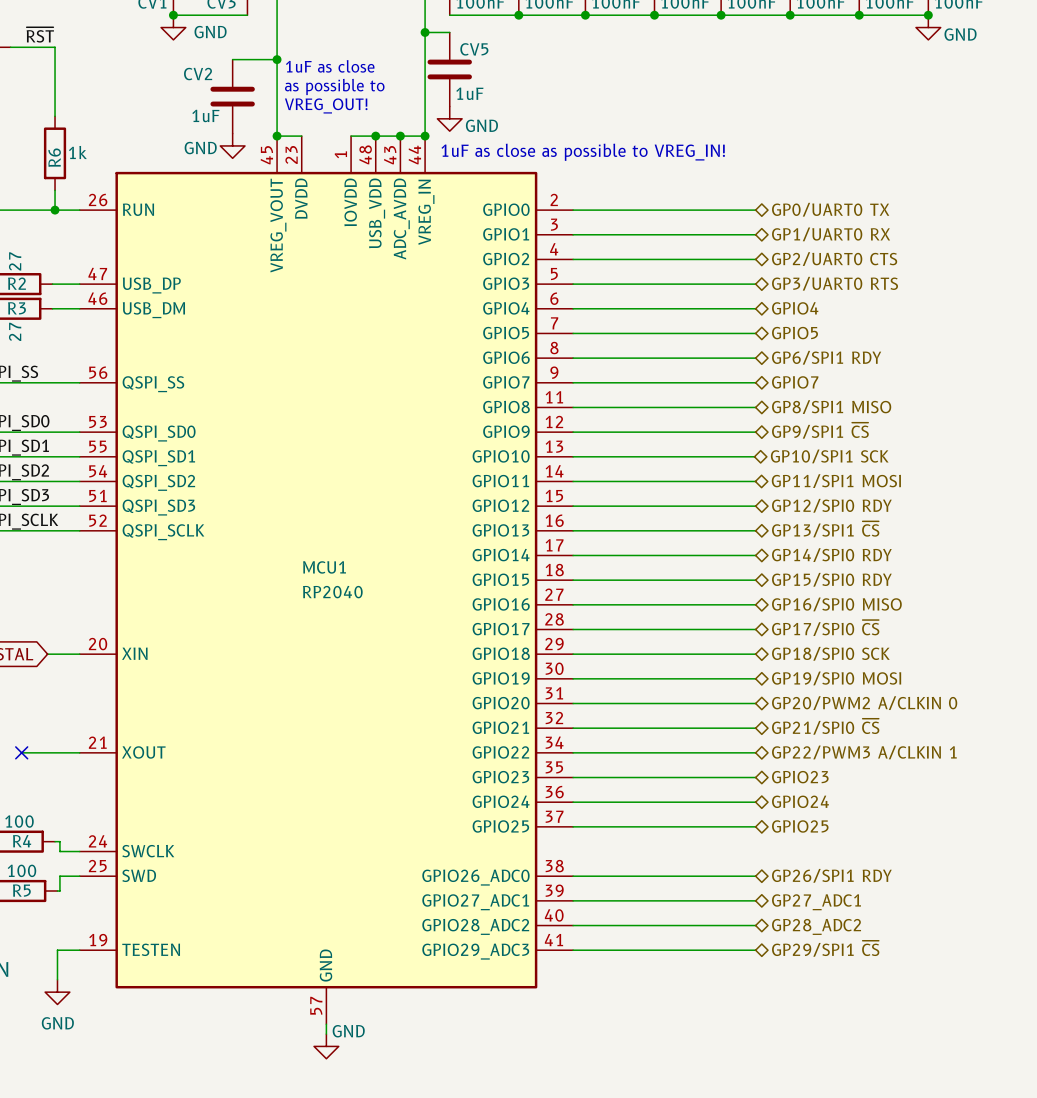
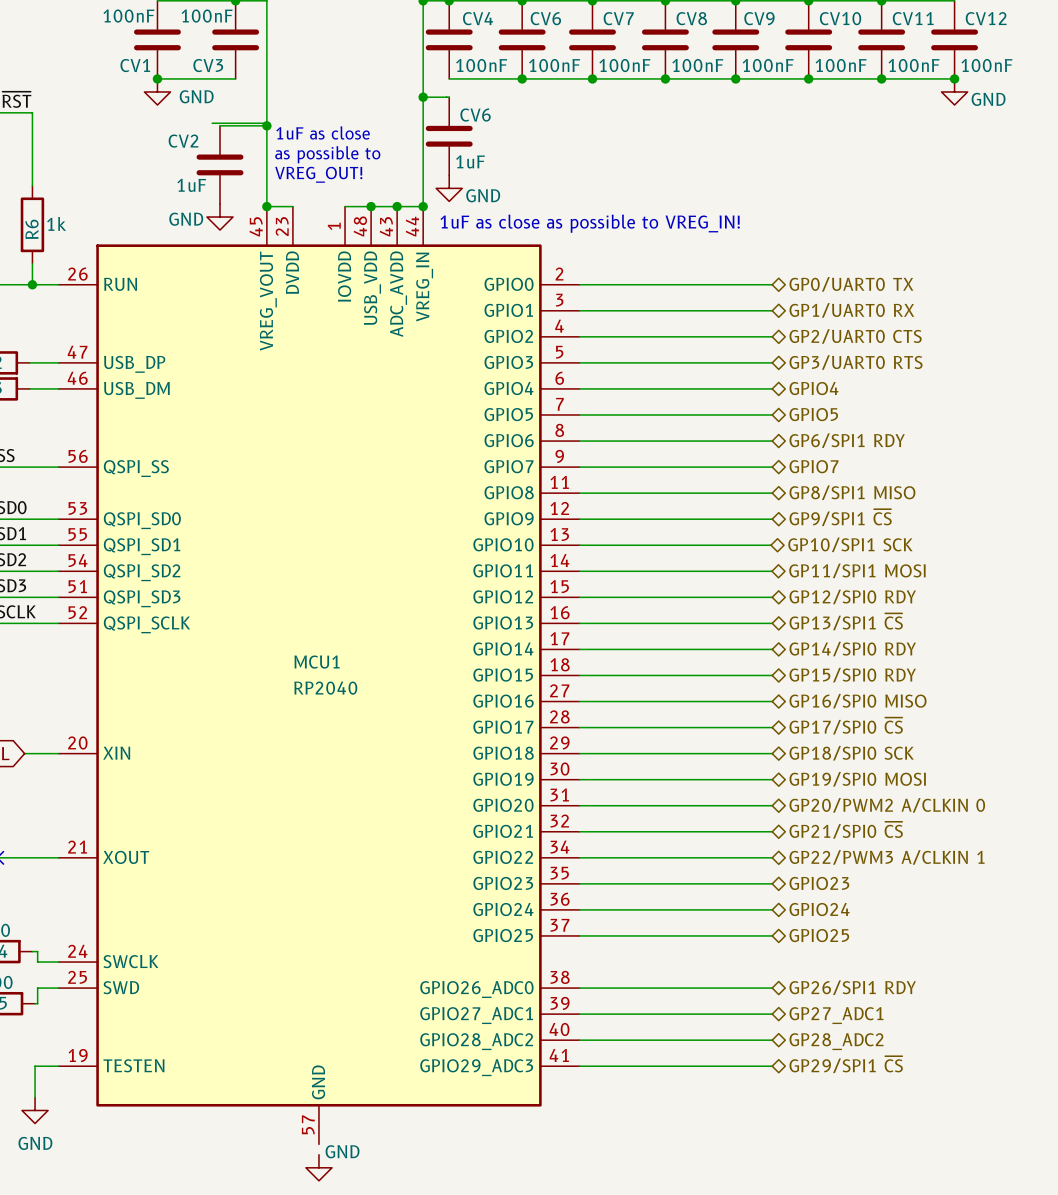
CV5 name: CV5 (474, 49) -> CV6 (475, 115)
wire: none -> (212, 123) (264, 123)
wire: (326, 1024) (326, 1034) -> none

